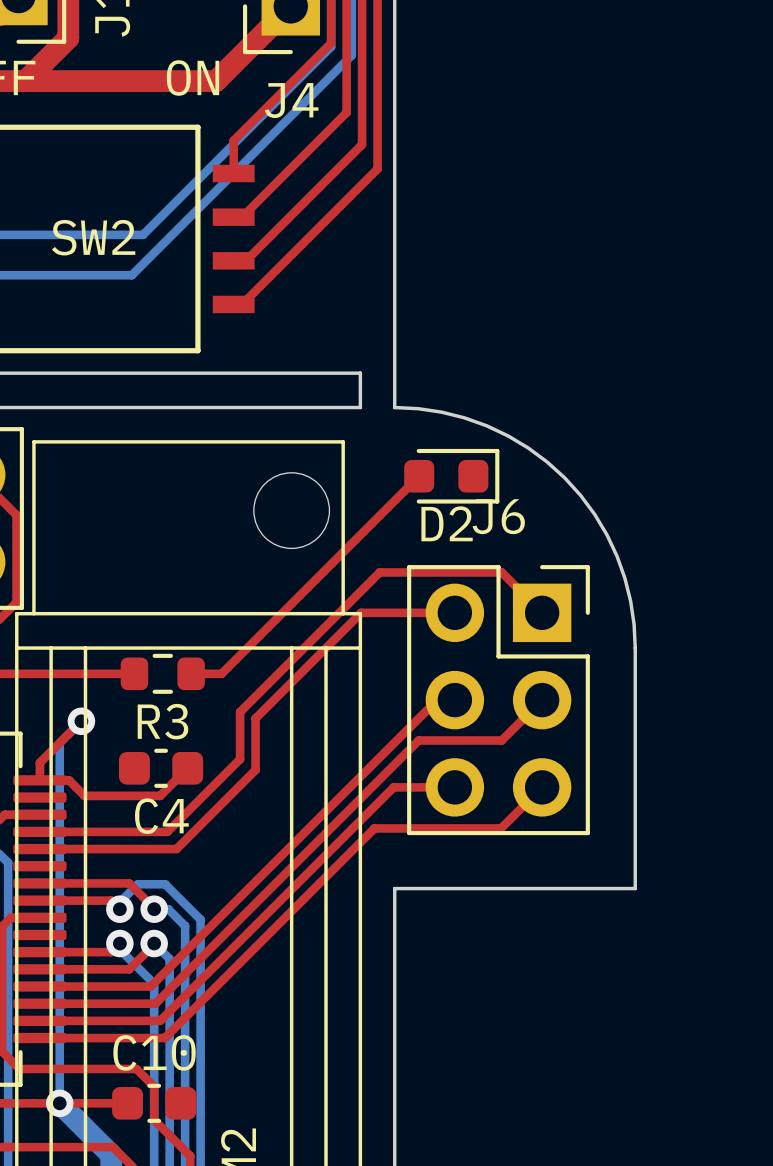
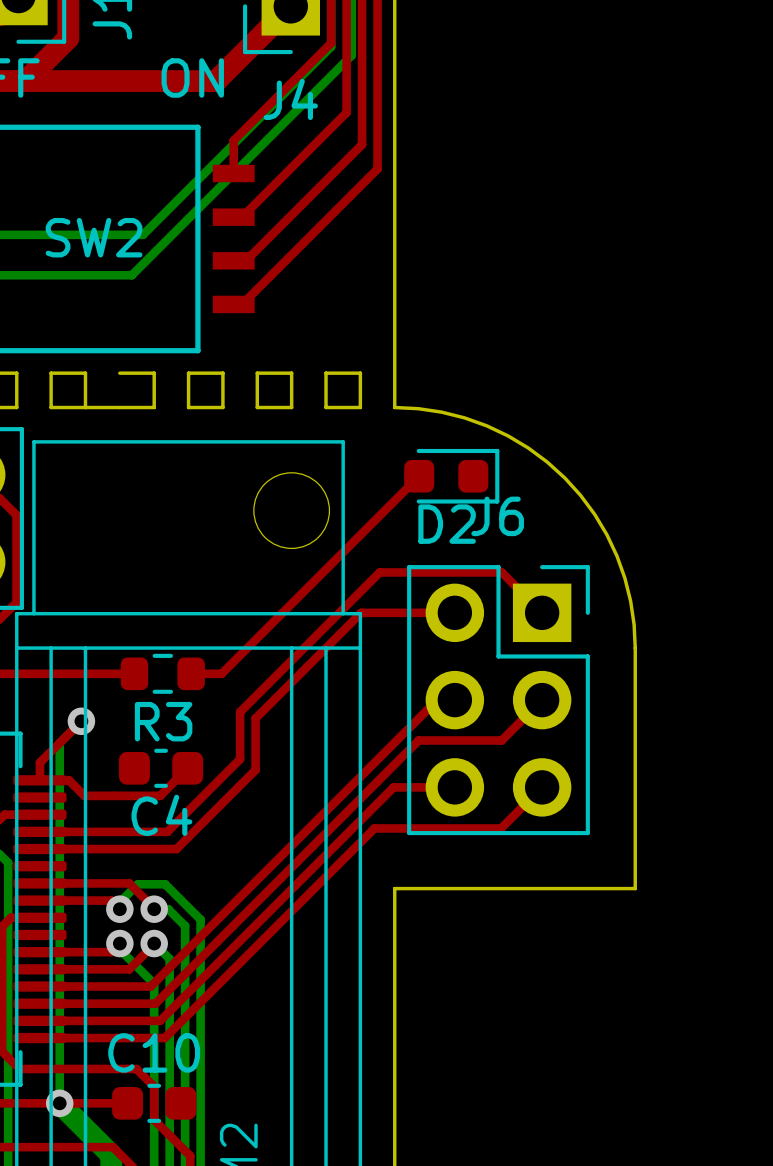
board edge: (16, 373) (51, 373) -> (16, 373) (16, 407)
board edge: (85, 373) (119, 373) -> (85, 373) (85, 407)
board edge: (154, 373) (188, 373) -> (154, 373) (154, 407)
board edge: (222, 373) (257, 373) -> (222, 373) (222, 407)
board edge: (291, 373) (326, 373) -> (291, 373) (291, 407)
board edge: (16, 407) (51, 407) -> (51, 373) (51, 407)
board edge: (154, 407) (188, 407) -> (188, 373) (188, 407)
board edge: (222, 407) (257, 407) -> (257, 373) (257, 407)
board edge: (291, 407) (326, 407) -> (326, 373) (326, 407)

